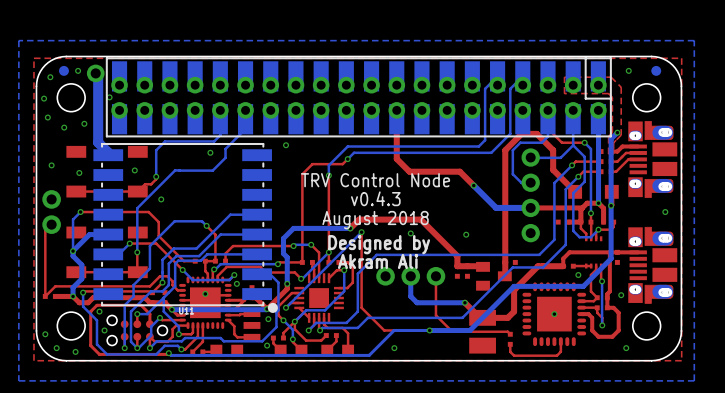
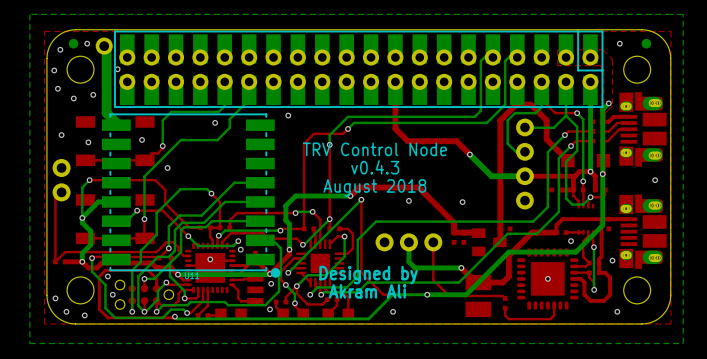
text position: Designed by (379, 244) -> Designed by (368, 275)
text position: Akram Ali (378, 261) -> Akram Ali (367, 291)

